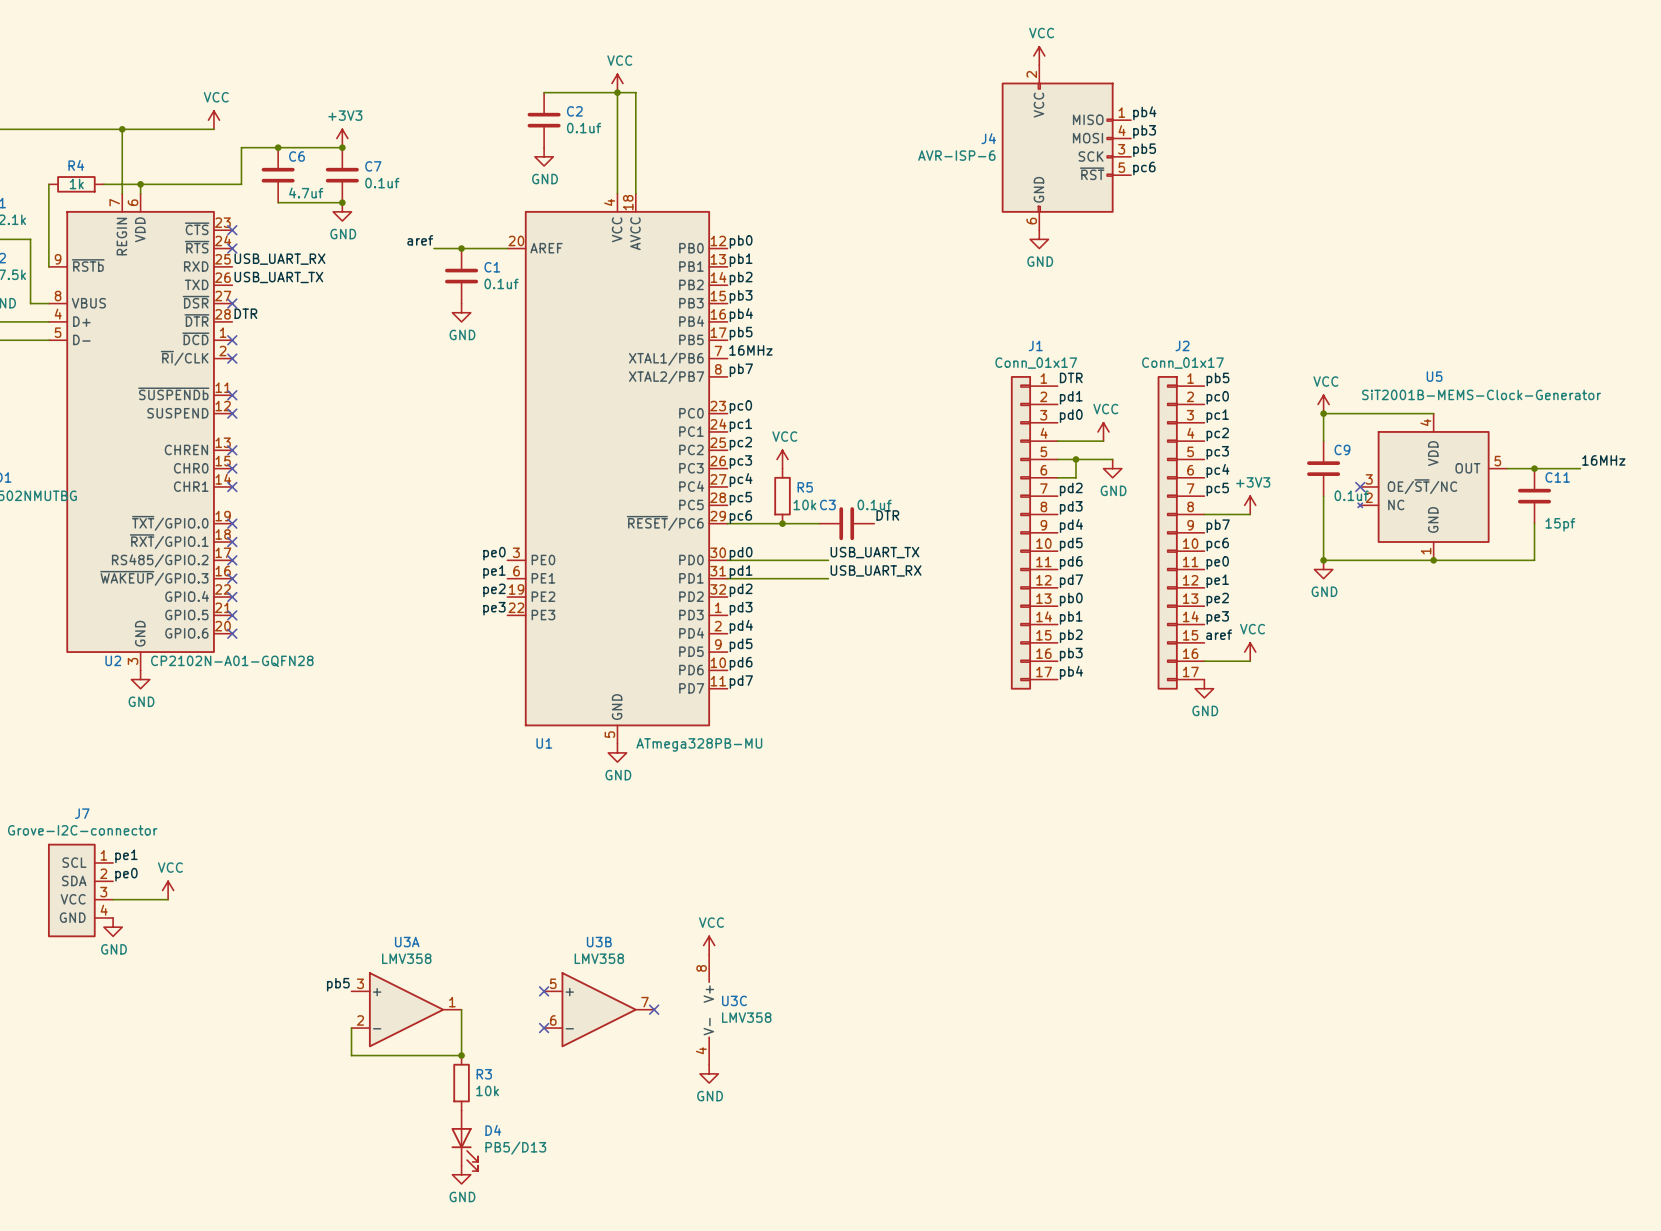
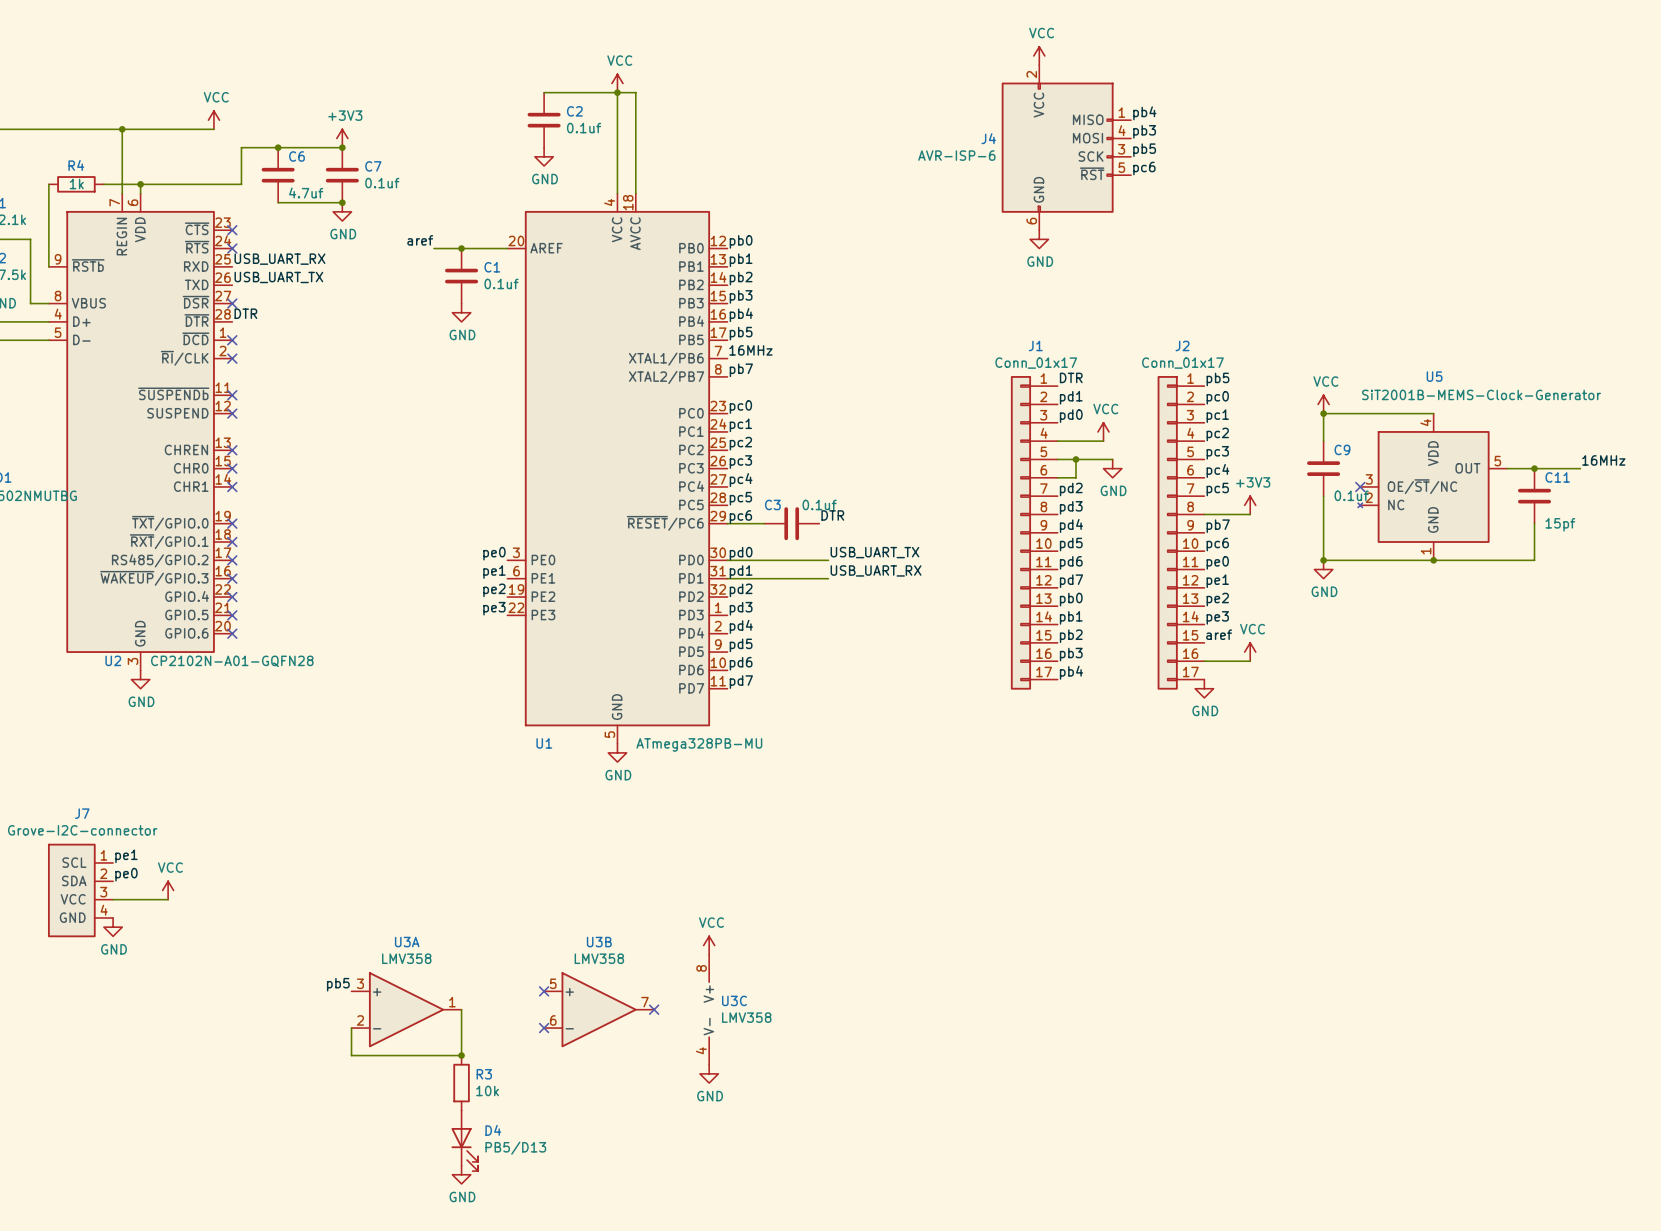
power symbol: VCC (782, 459) -> none
R5: 10k (782, 496) -> none
label position: DTR (887, 515) -> DTR (832, 515)
junction: (782, 523) -> none
C3 position: (846, 523) -> (791, 523)

